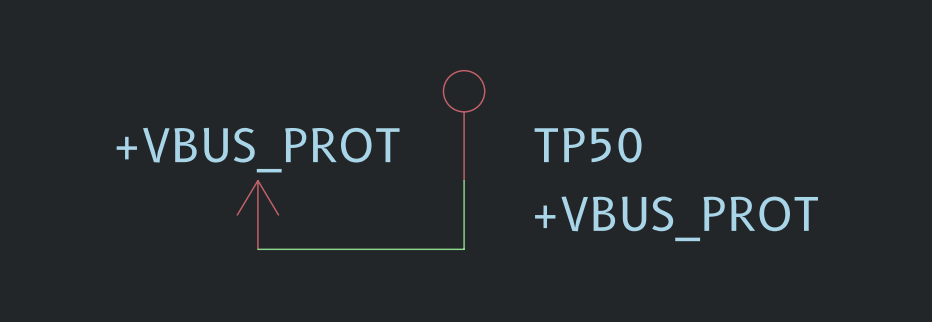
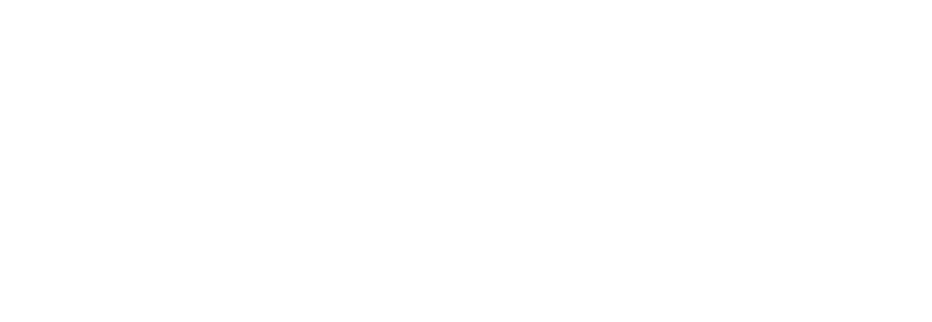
TP50: +VBUS_PROT (464, 125) -> none
wire: (464, 180) (464, 249) (257, 249) -> none
power symbol: +VBUS_PROT (257, 214) -> none

